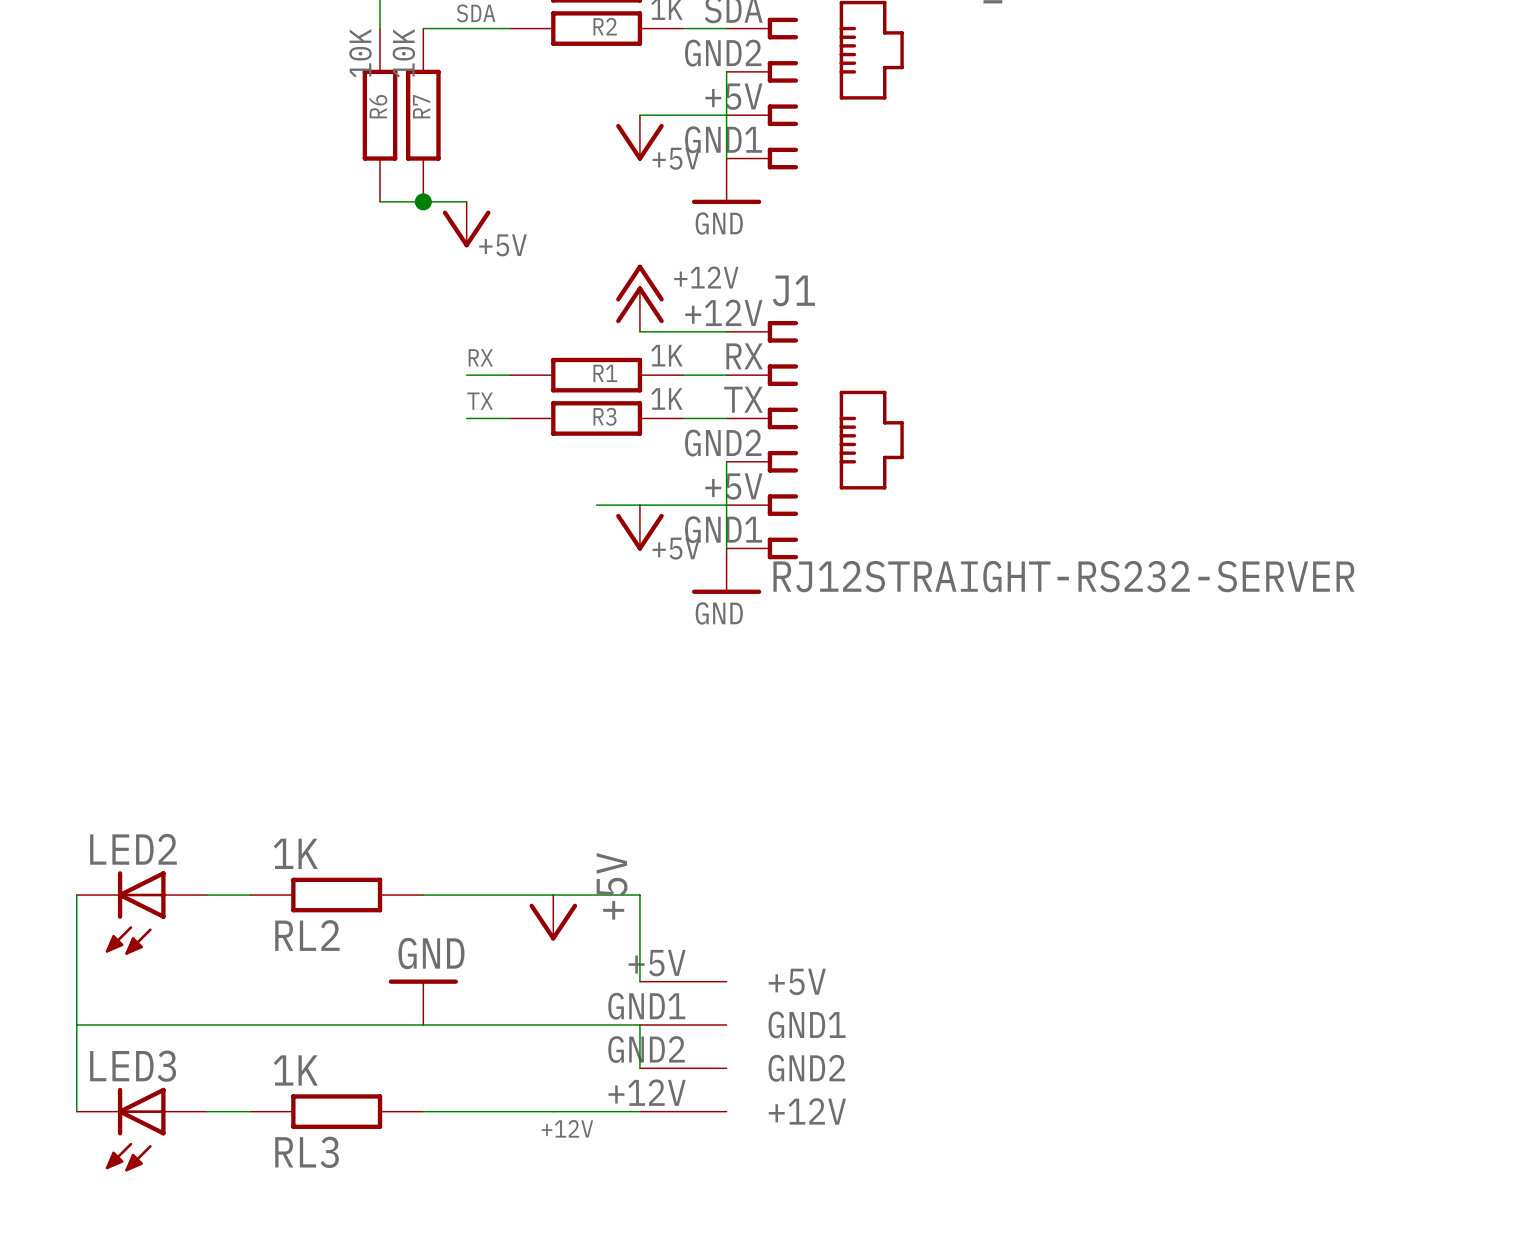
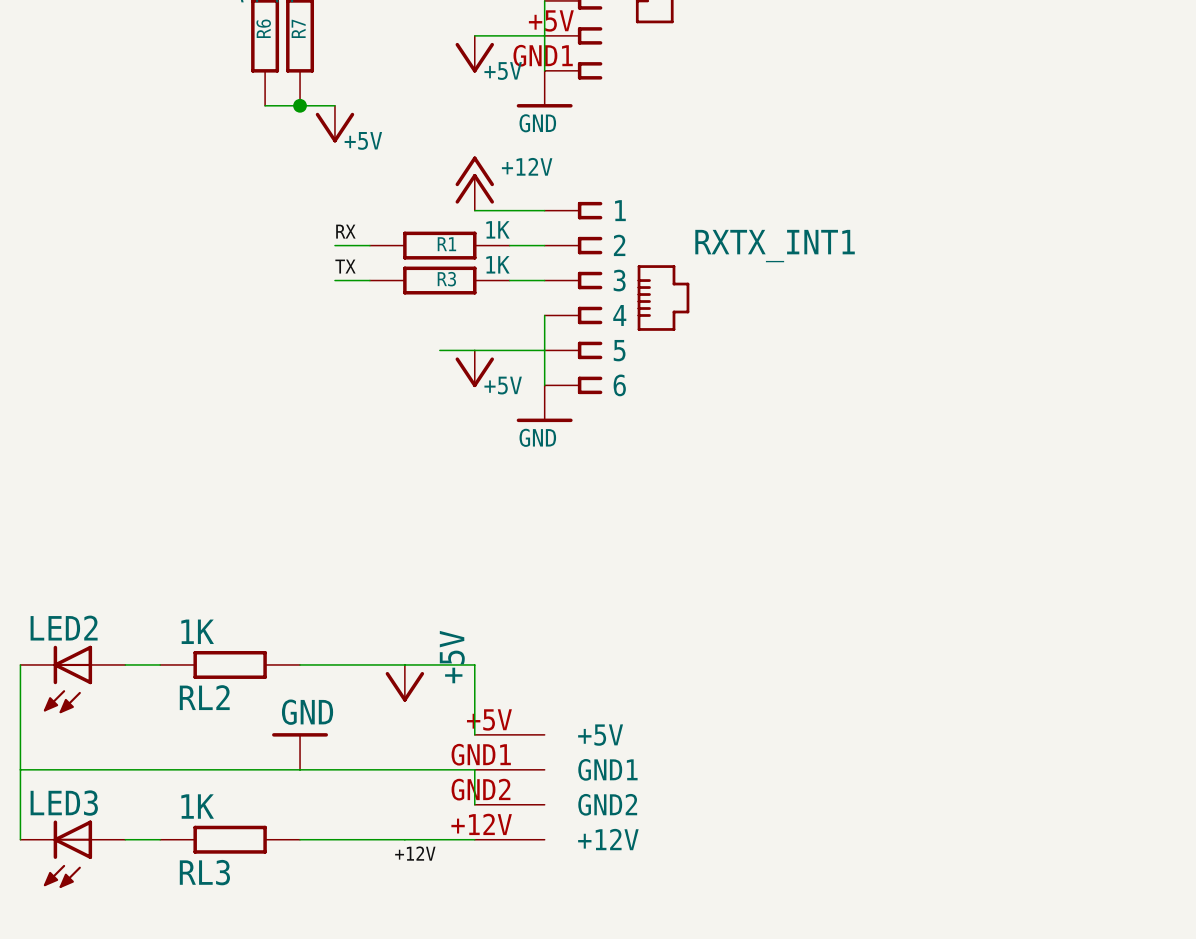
J1: RJ12STRAIGHT-RS232-SERVER (815, 440) -> none
RXTX_INT1: none -> (617, 298)

